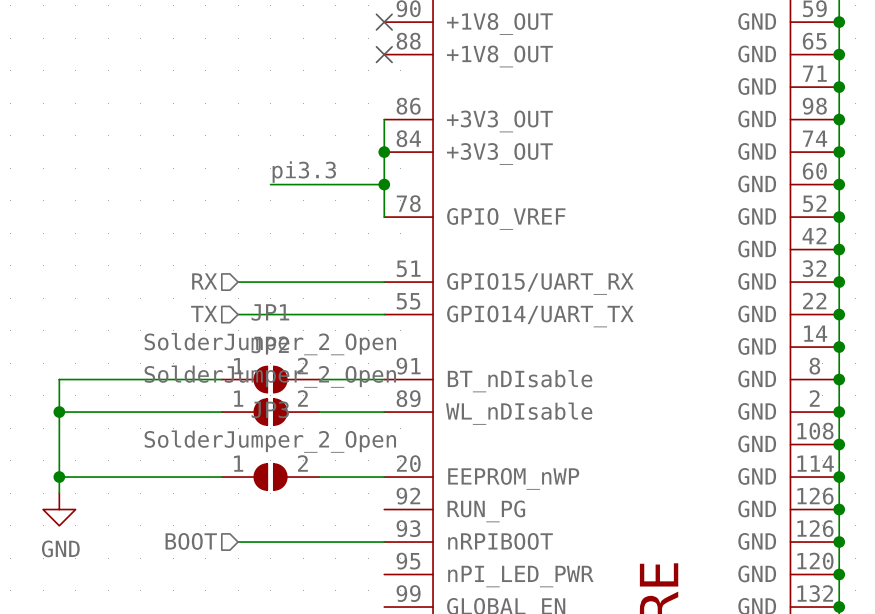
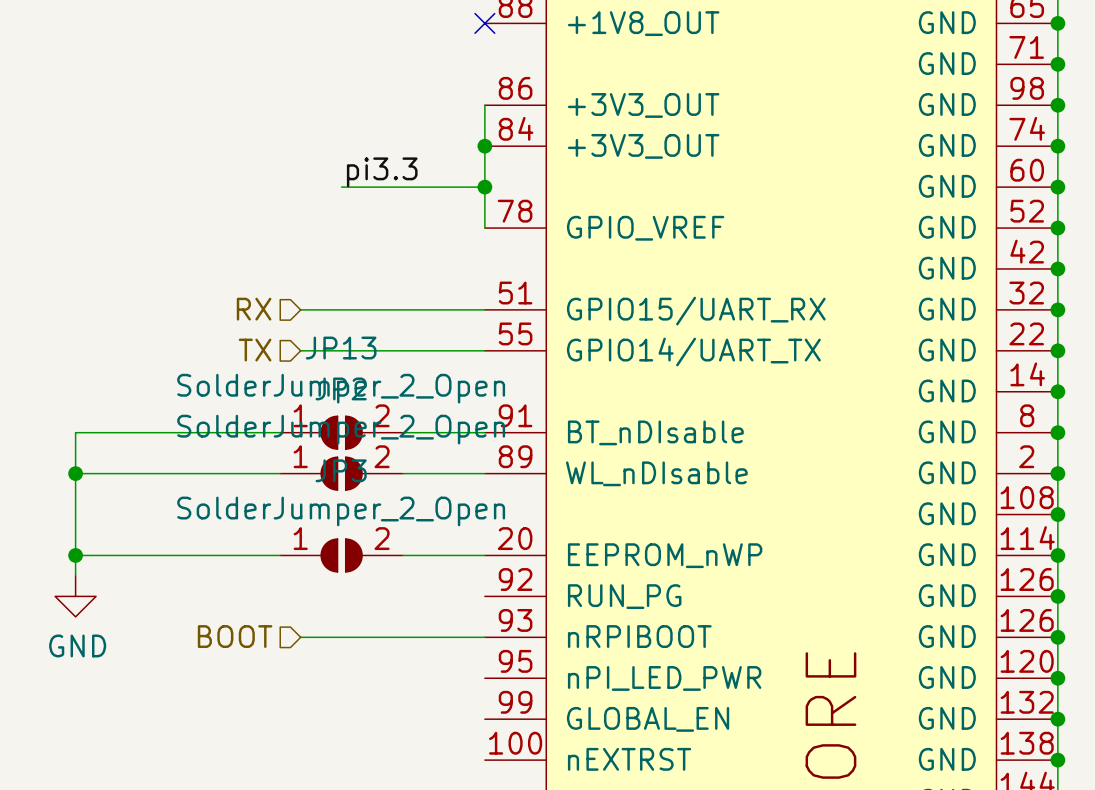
JP1 name: JP1 (270, 312) -> JP13 (341, 348)

